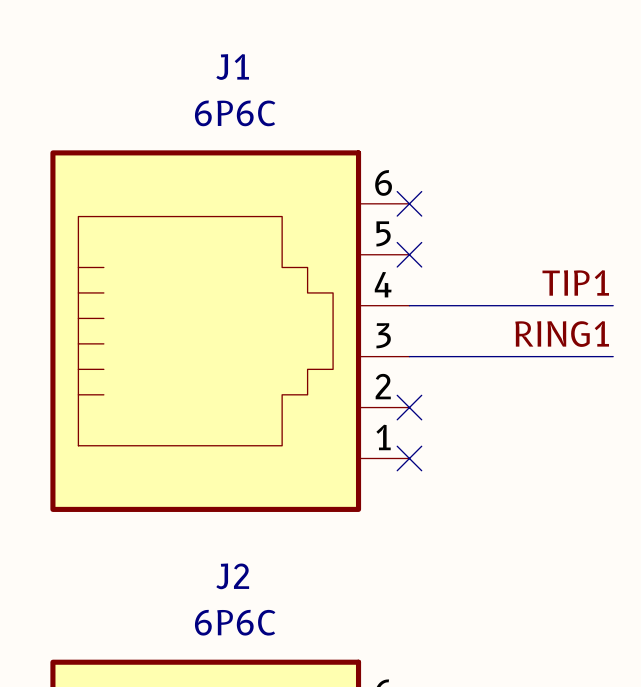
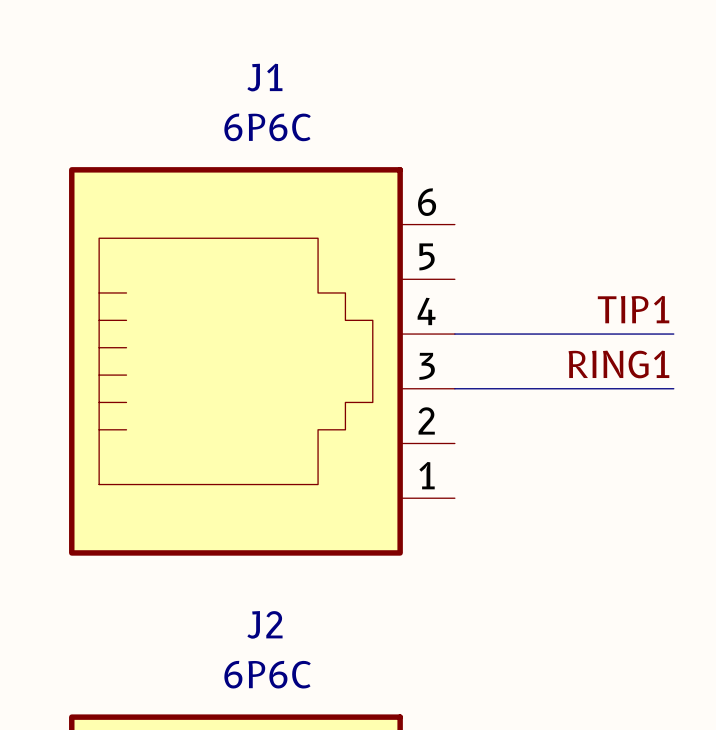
no-connect mark: (409, 203) -> none
no-connect mark: (409, 254) -> none
no-connect mark: (409, 407) -> none
no-connect mark: (409, 458) -> none

